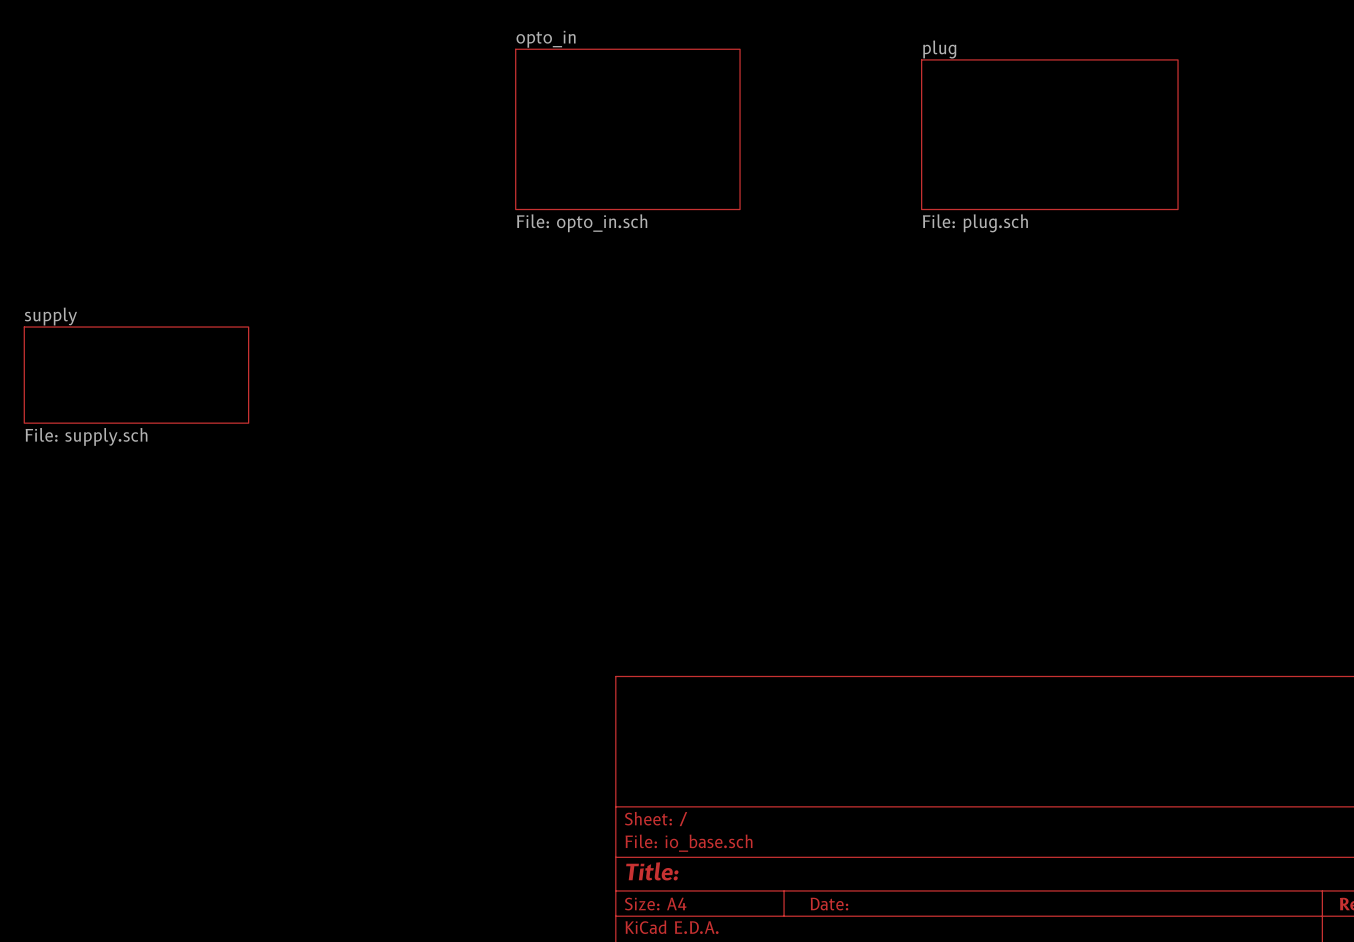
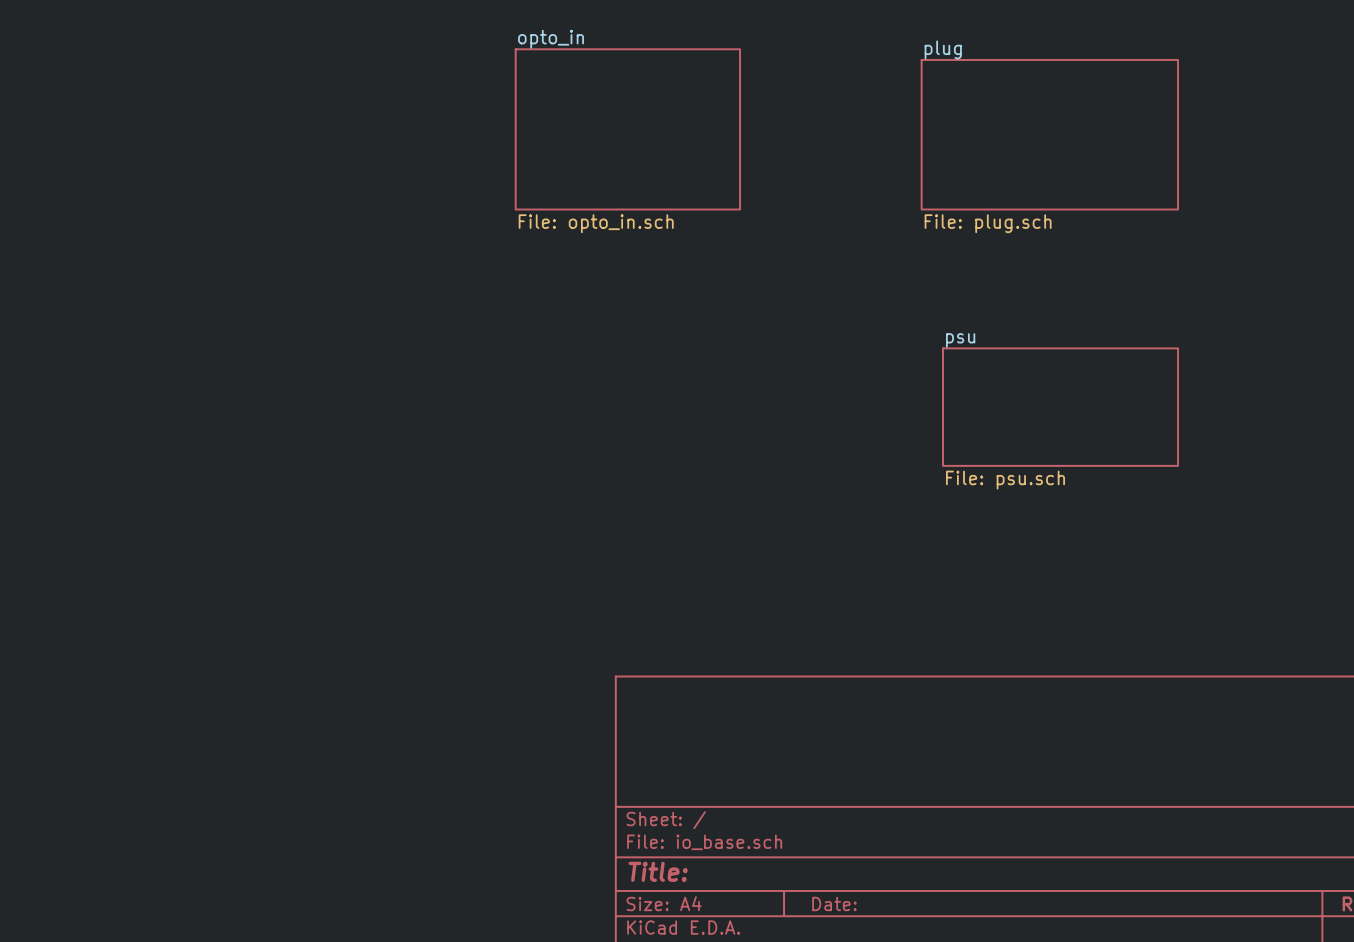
sheet supply: File: supply.sch (136, 375) -> none
sheet psu: none -> File: psu.sch (1060, 407)

